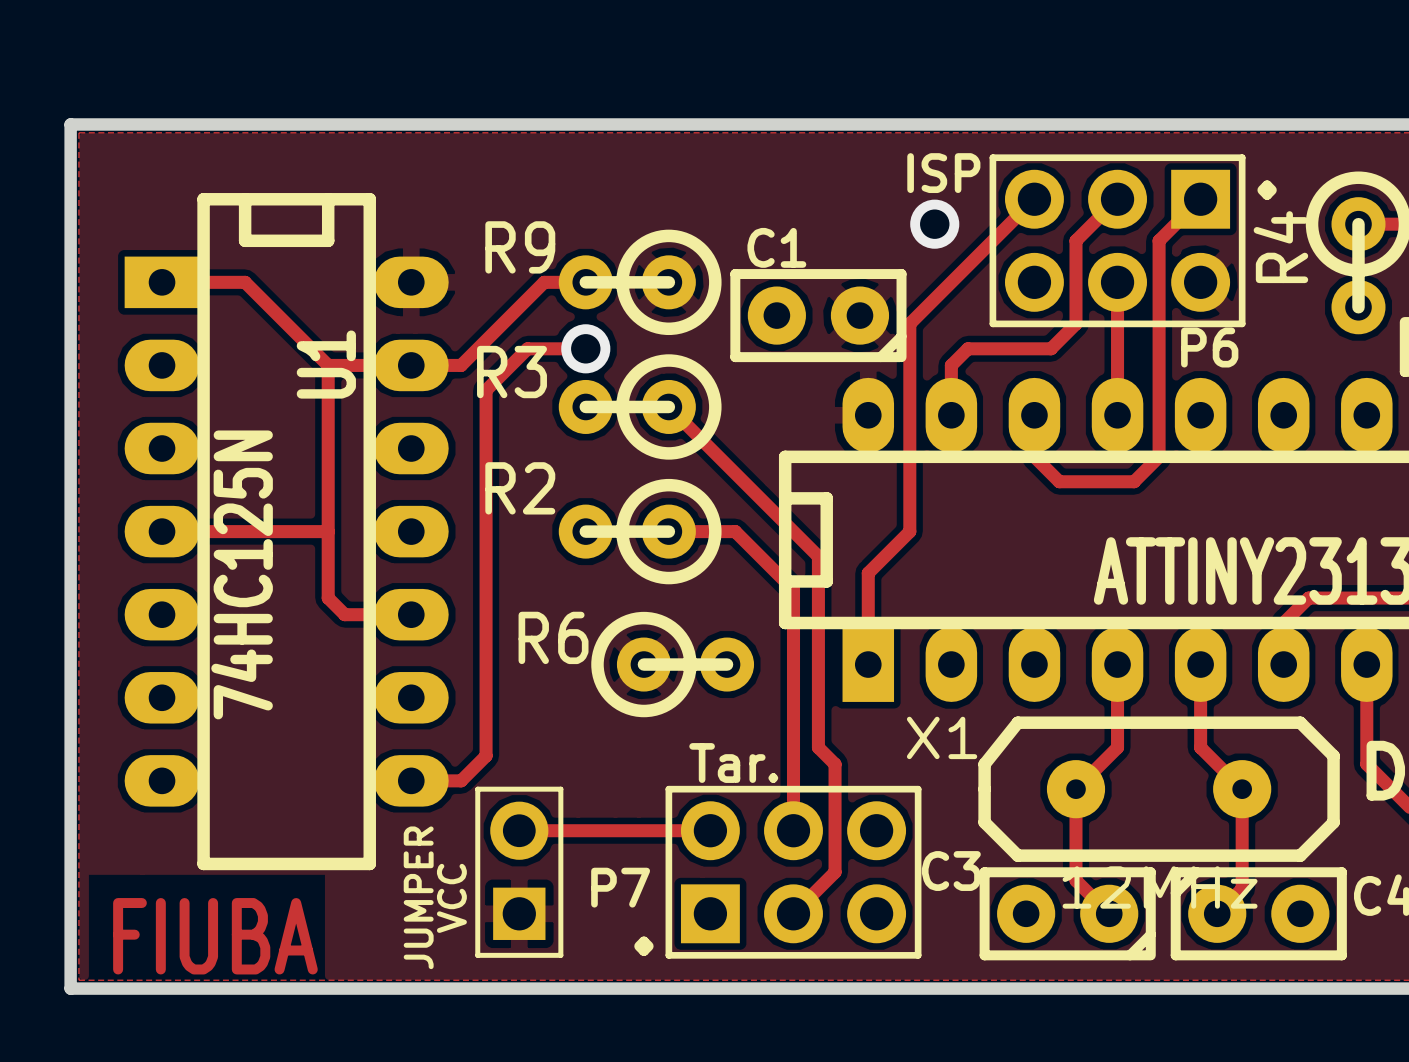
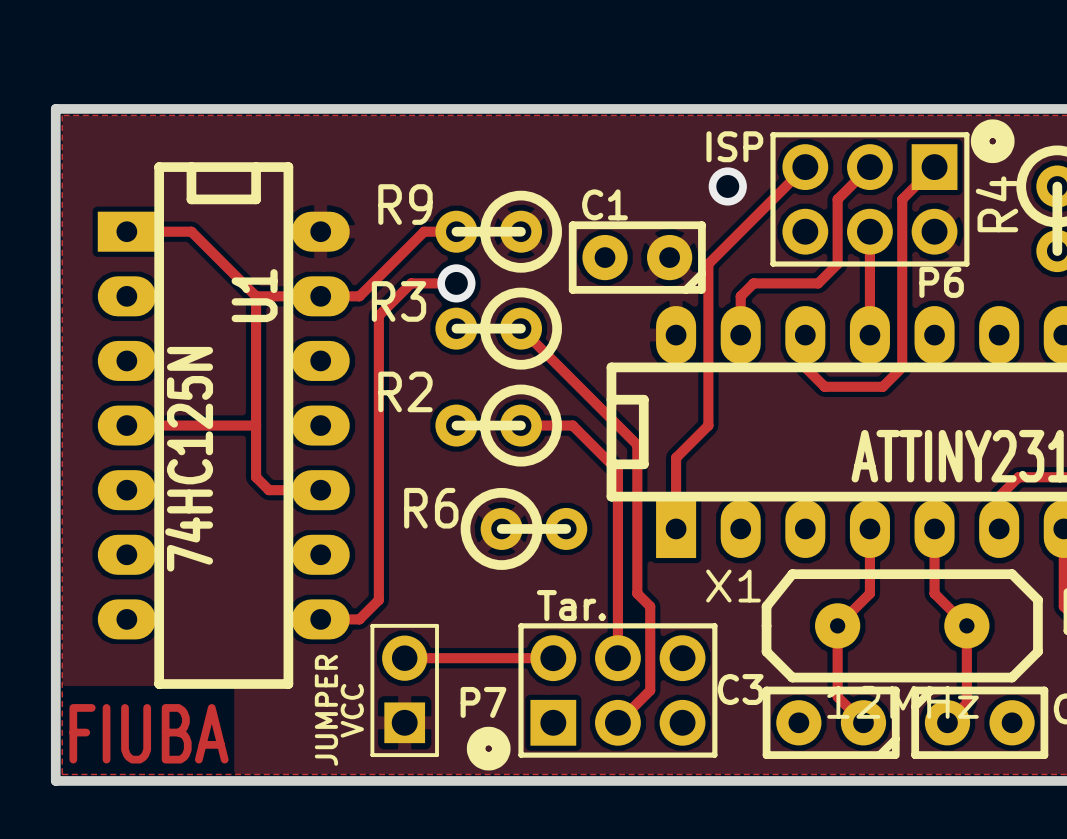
drawing: none -> [970, 119, 1015, 164]
text: . (1267, 190) -> none
drawing: none -> [466, 726, 511, 771]
text position: FIUBA (215, 936) -> FIUBA (149, 733)
text: . (643, 946) -> none

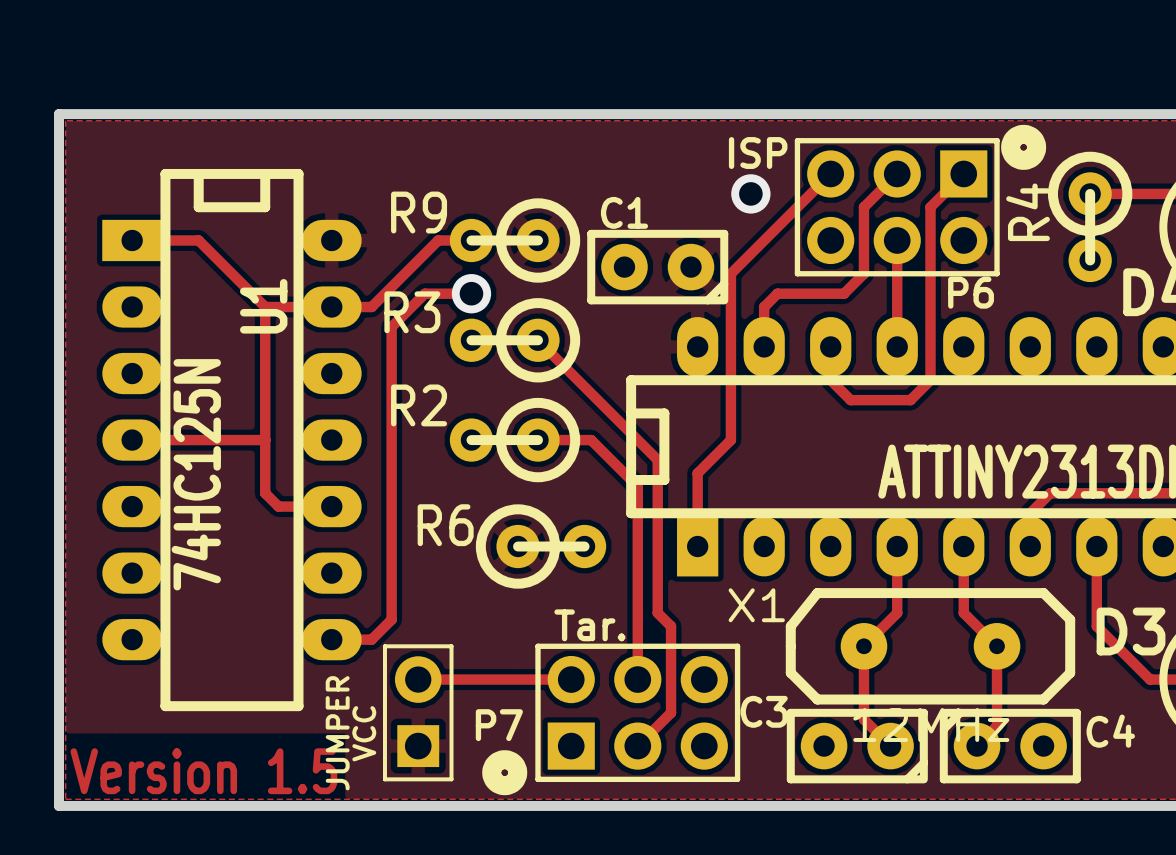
text: FIUBA (149, 733) -> none
text: none -> Version 1.5 (203, 771)

